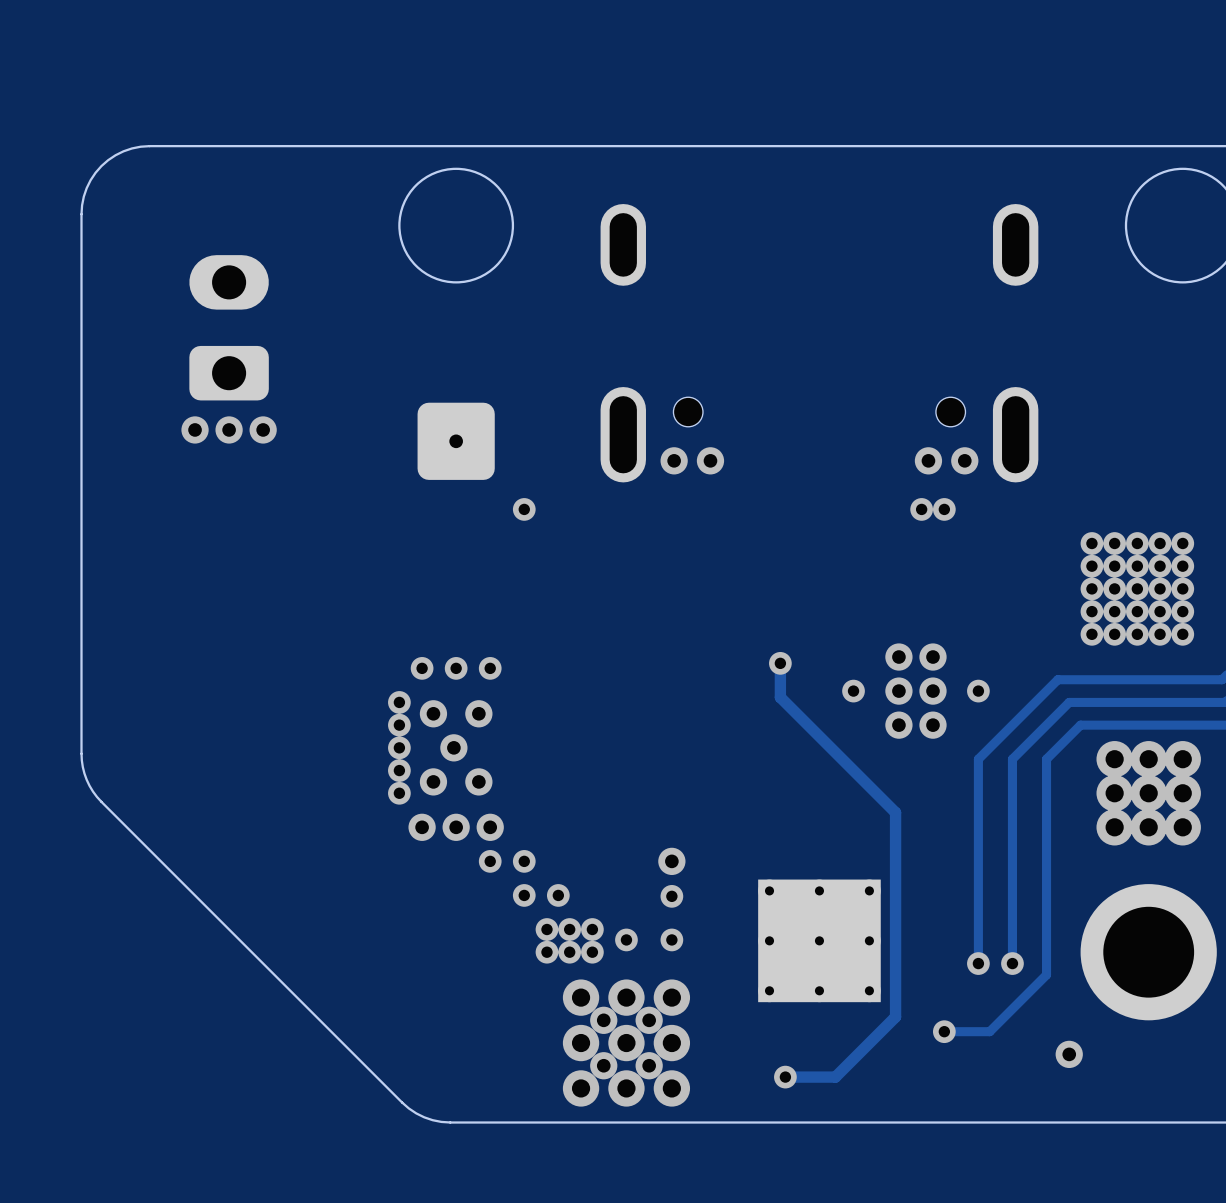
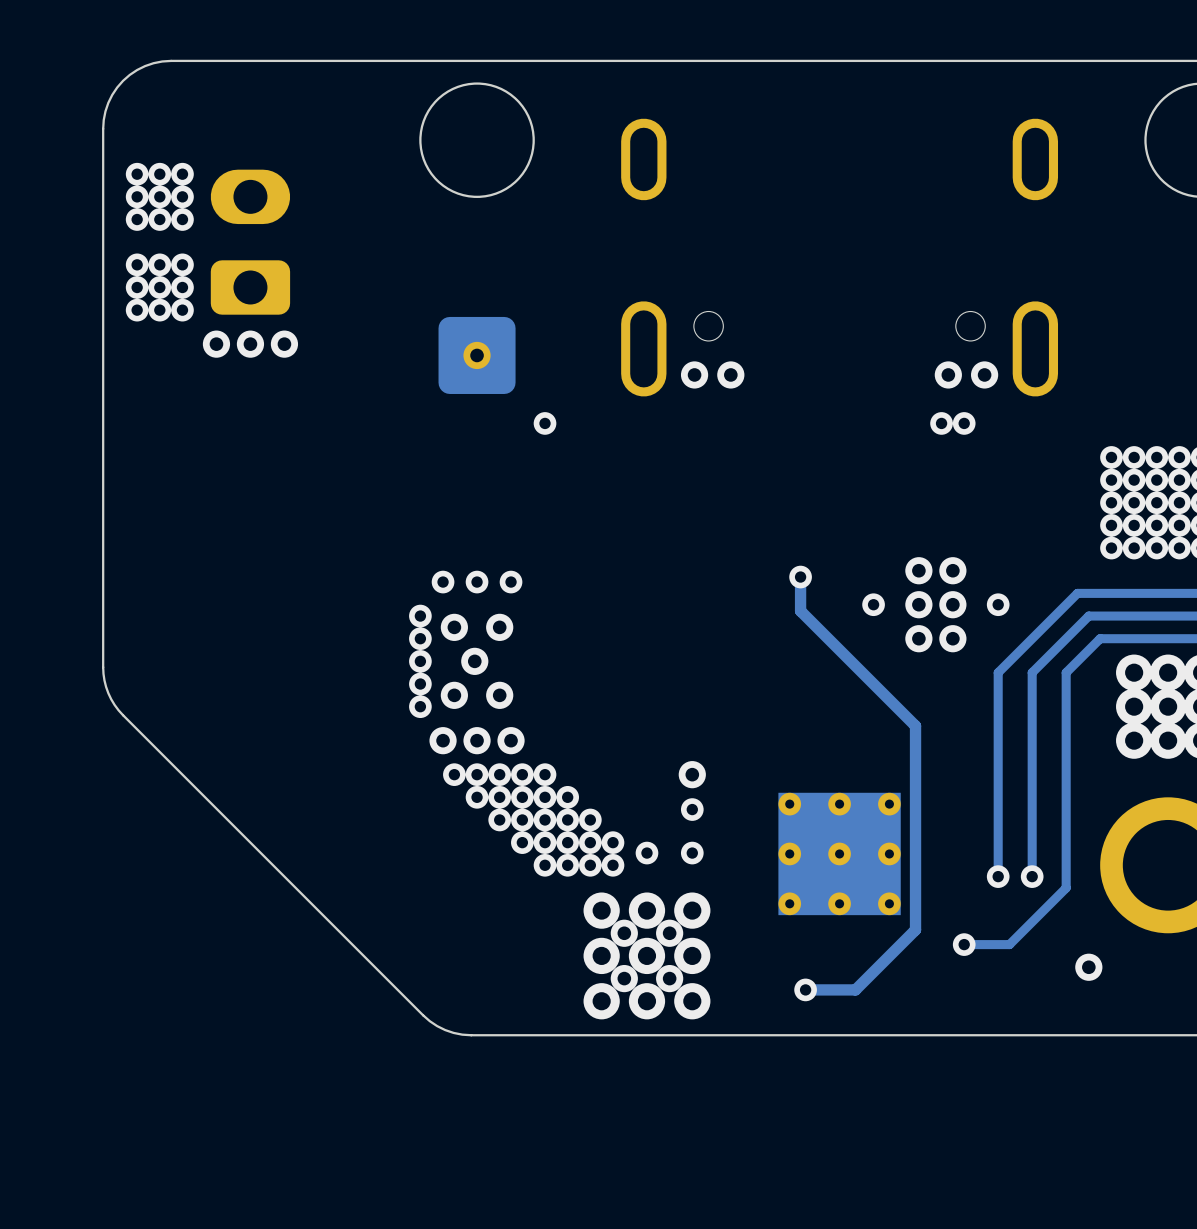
via: none -> (137, 174)
via: none -> (159, 174)
via: none -> (182, 174)
via: none -> (137, 196)
via: none -> (159, 196)
via: none -> (182, 196)
via: none -> (137, 219)
via: none -> (159, 219)
via: none -> (182, 219)
via: none -> (137, 264)
via: none -> (159, 264)
via: none -> (182, 264)
via: none -> (137, 287)
via: none -> (159, 287)
via: none -> (182, 287)
via: none -> (137, 310)
via: none -> (159, 310)
via: none -> (182, 310)
via: none -> (454, 774)
via: none -> (477, 774)
via: none -> (499, 774)
via: (490, 861) -> none
via: none -> (522, 774)
via: none -> (477, 797)
via: none -> (499, 797)
via: none -> (522, 797)
via: none -> (545, 797)
via: none -> (567, 797)
via: (524, 895) -> none
via: (558, 895) -> none
via: none -> (499, 819)
via: none -> (522, 819)
via: none -> (545, 819)
via: none -> (567, 819)
via: none -> (590, 819)
via: none -> (522, 842)
via: none -> (545, 842)
via: none -> (545, 865)

